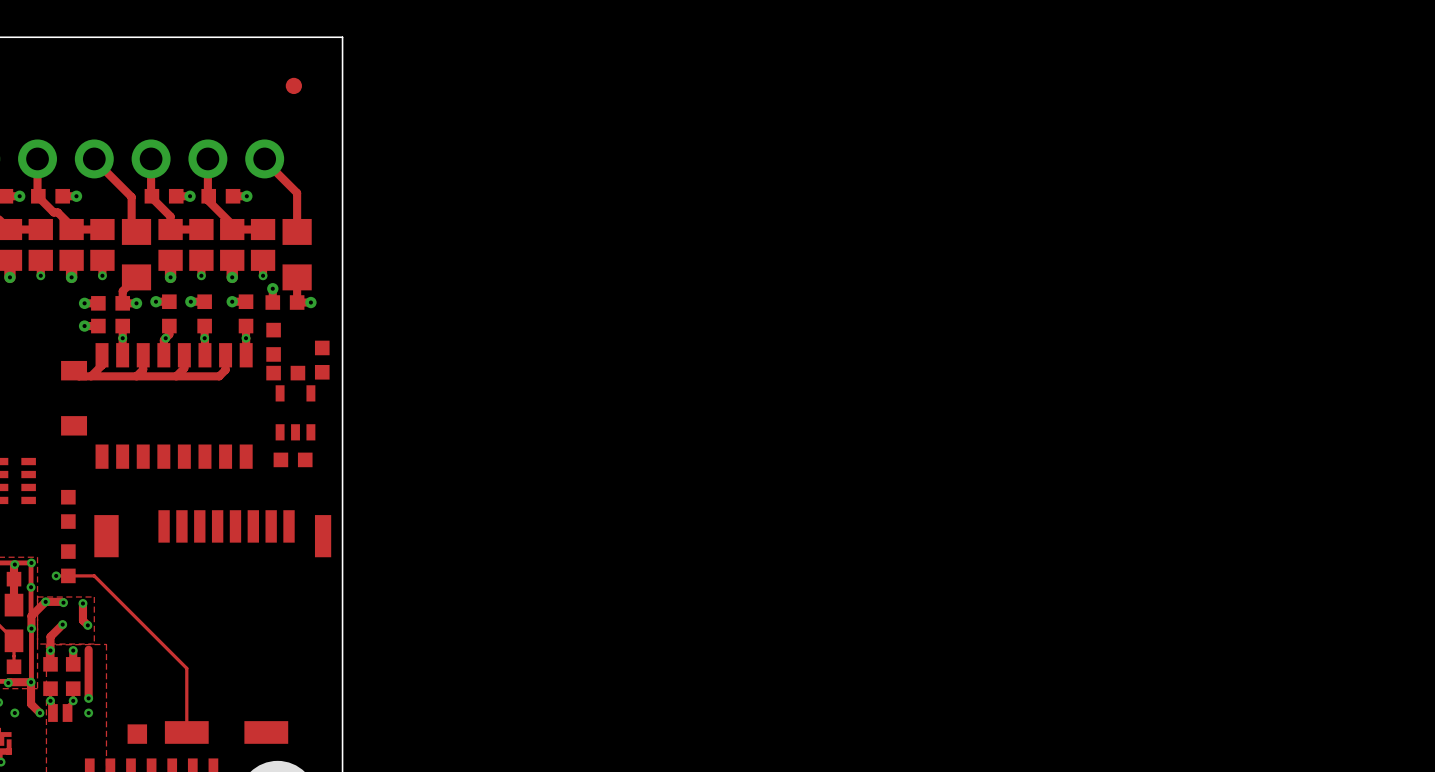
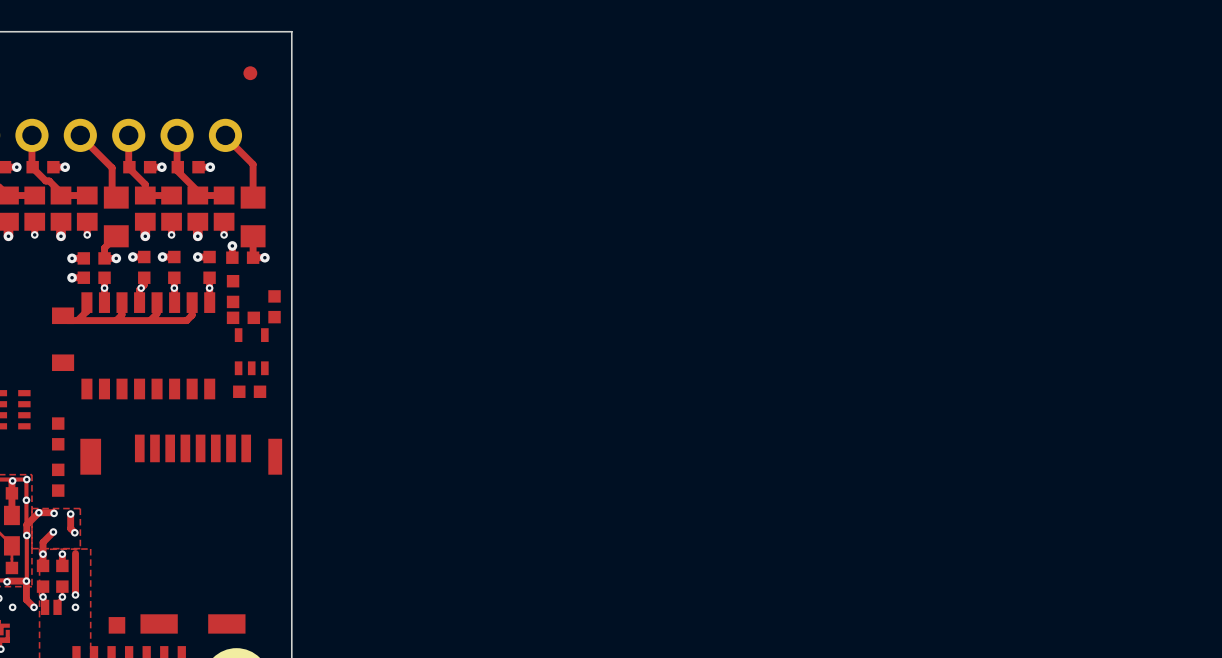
track: (56, 575) (94, 575) (186, 668) (186, 732) -> none
via: (56, 575) -> none

